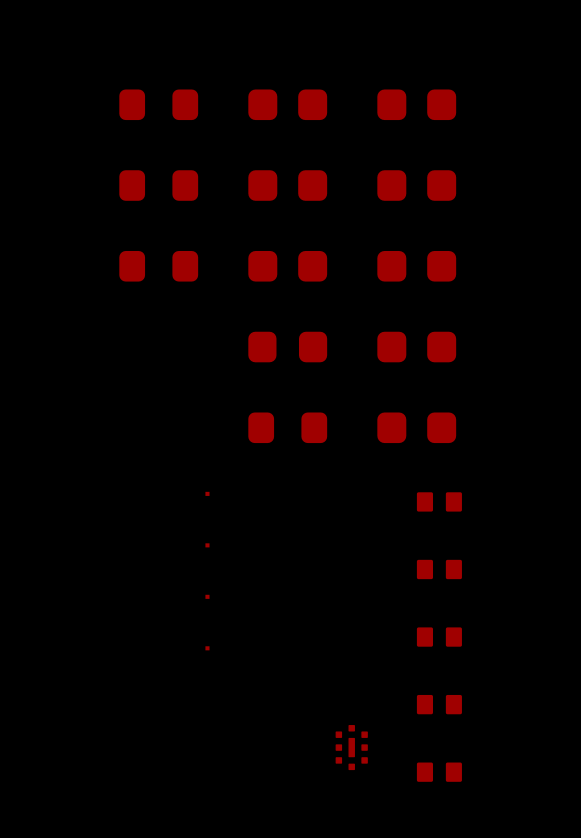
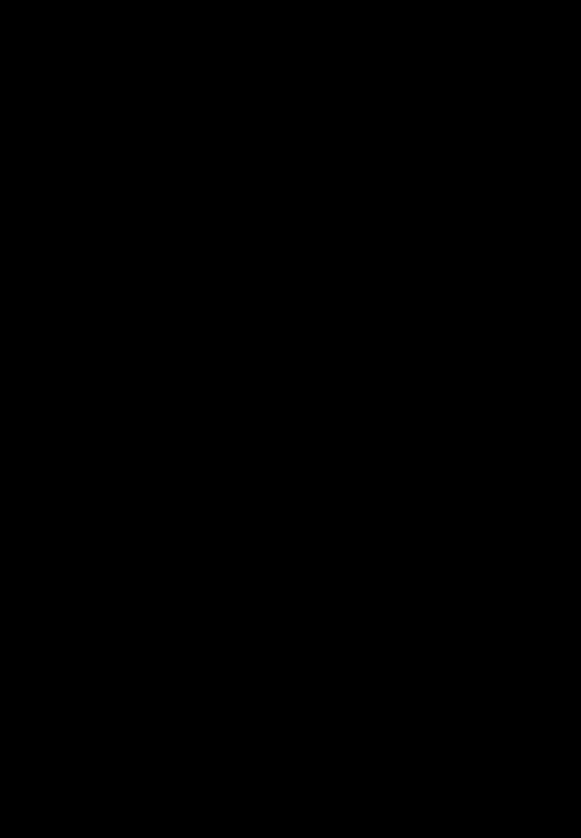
part: (158, 104) -> none
part: (287, 104) -> none
part: (416, 104) -> none
part: (158, 185) -> none
part: (287, 185) -> none
part: (416, 185) -> none
part: (158, 266) -> none
part: (287, 266) -> none
part: (416, 266) -> none
part: (287, 347) -> none
part: (416, 347) -> none
part: (287, 427) -> none
part: (416, 427) -> none
part: (207, 493) -> none
part: (439, 501) -> none
part: (207, 545) -> none
part: (439, 569) -> none
part: (207, 596) -> none
part: (439, 637) -> none
part: (207, 648) -> none
part: (439, 704) -> none
part: (351, 747) -> none
part: (439, 772) -> none

